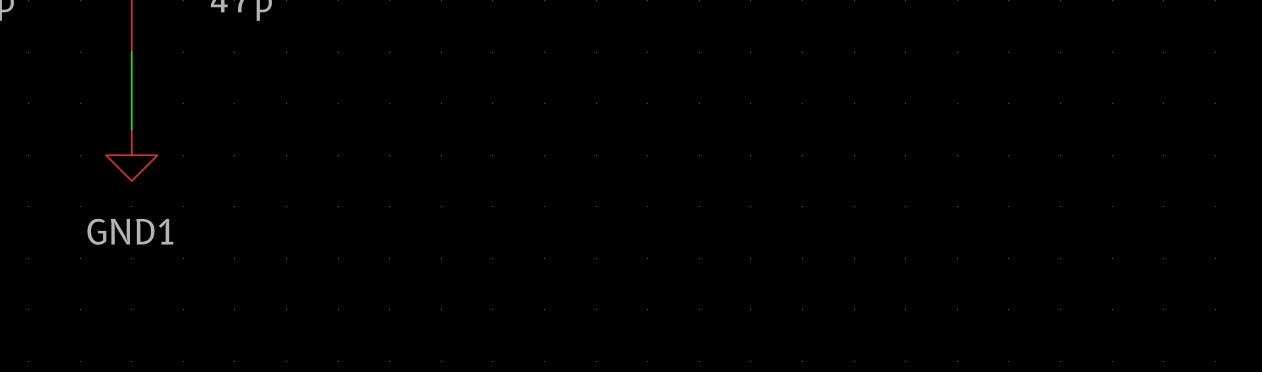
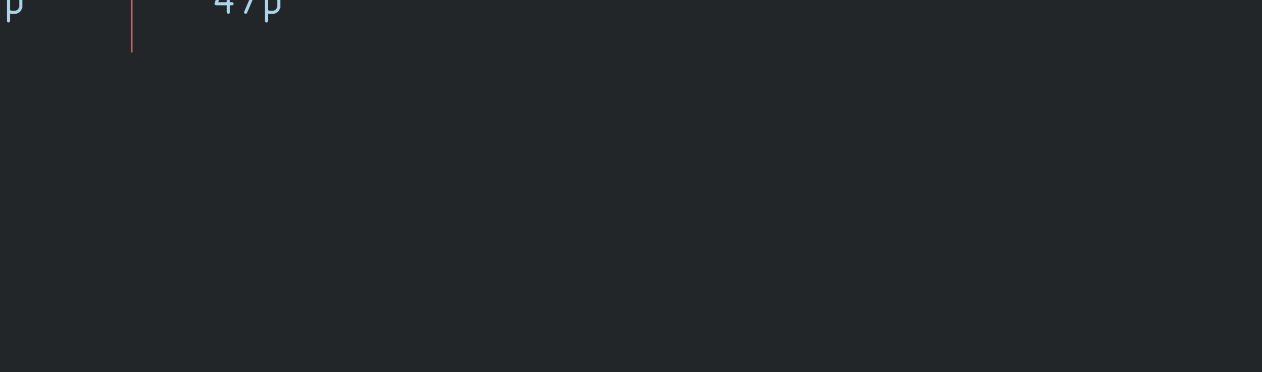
wire: (131, 52) (131, 129) -> none
power symbol: GND1 (131, 155) -> none

